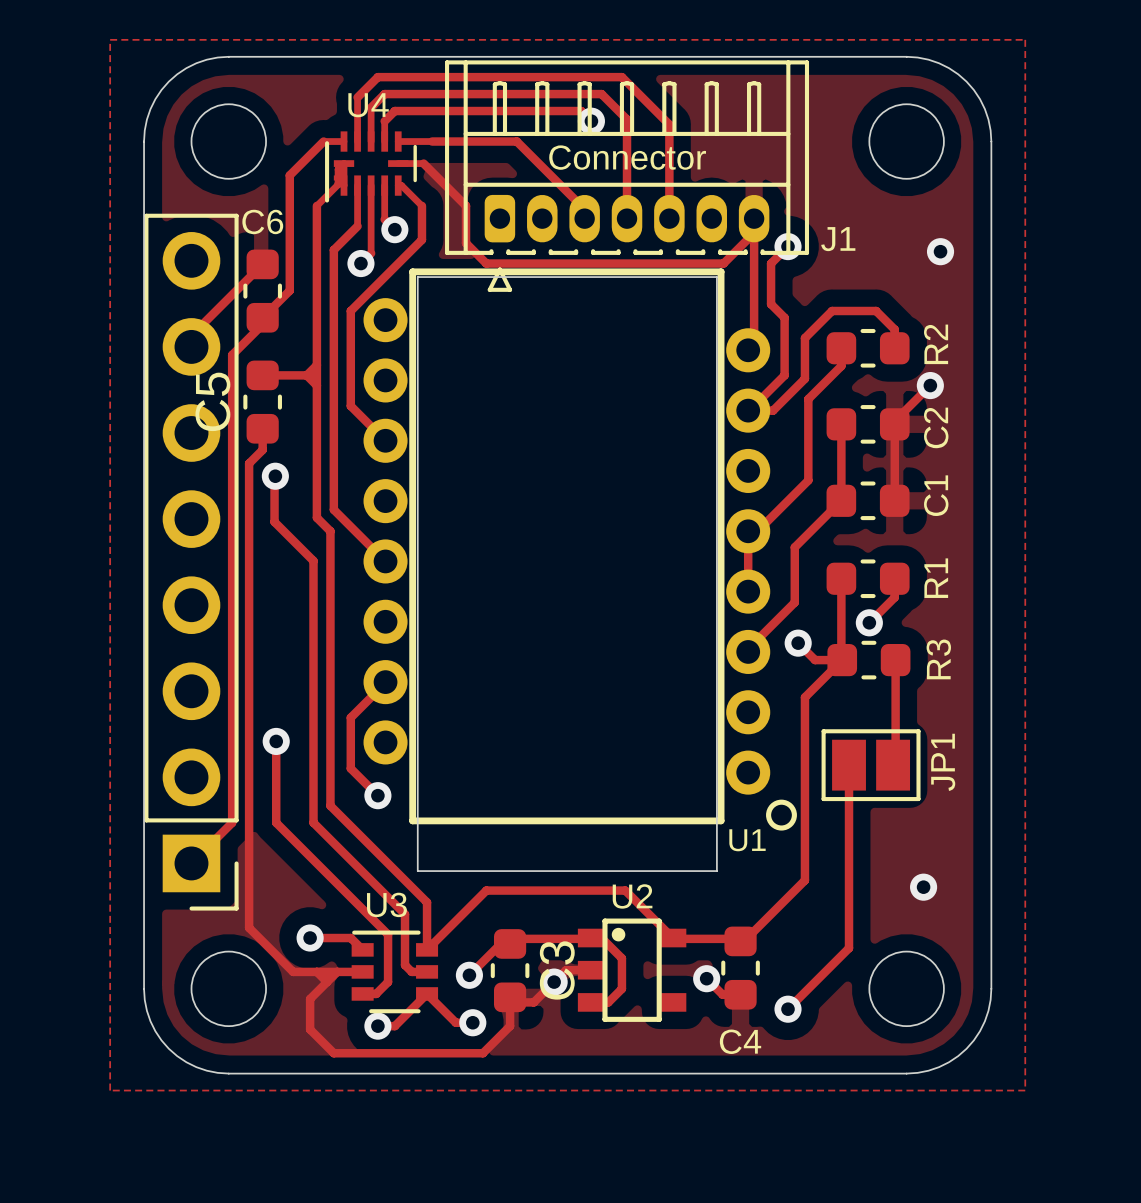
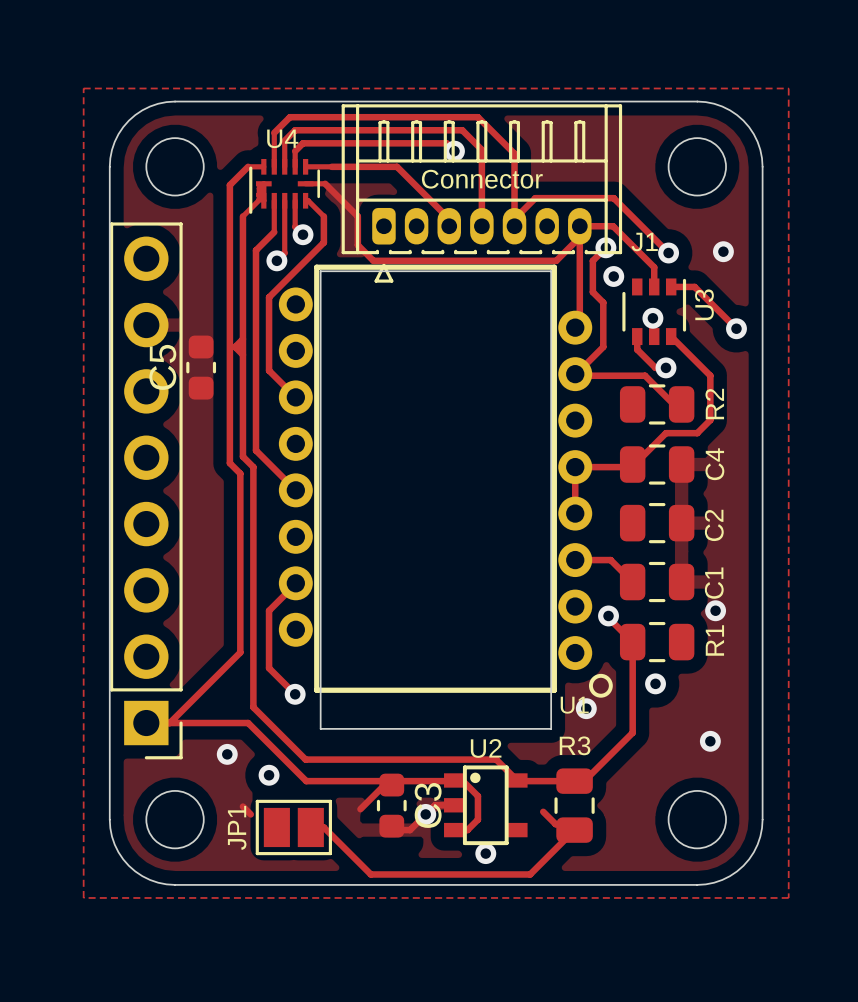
track: (299, 165) (289, 175) (289, 290) (262, 317) -> (229, 185) (229, 463) (240, 473) (240, 489)
track: none -> (514, 219) (535, 198) (613, 198) (668, 252)
track: none -> (579, 226) (613, 226) (654, 267) (654, 286)
via: none -> (668, 252)
track: (262, 264) (191, 335) (191, 346) -> none
via: none -> (613, 276)
C6: (262, 291) -> none
track: none -> (671, 286) (694, 286) (736, 328)
track: (262, 317) (262, 324) (232, 355) (232, 822) (191, 863) -> (391, 781) (306, 781) (248, 723) (146, 723)
R2 footprint: [826, 328, 910, 368] -> [619, 384, 695, 425]
via: none -> (652, 318)
track: (841, 348) (841, 366) (808, 399) (808, 480) (757, 531) -> (671, 336) (710, 375) (710, 420) (697, 433) (665, 433) (630, 467) (582, 467)
track: (894, 348) (894, 329) (876, 310) (832, 310) (804, 338) (804, 378) (773, 410) (749, 410) -> (681, 404) (673, 404) (645, 375) (576, 375) (575, 374)
via: none -> (736, 328)
track: none -> (637, 336) (637, 349) (655, 367) (665, 367)
track: (262, 375) (306, 375) -> none
track: (930, 385) (894, 421) (894, 500) -> none
via: (930, 385) -> none
via: none -> (665, 367)
C2 footprint: [826, 405, 910, 444] -> [619, 503, 695, 544]
track: (841, 424) (841, 500) (794, 547) (794, 602) (748, 649) (748, 651) -> (632, 582) (610, 560) (575, 560)
track: (262, 428) (262, 449) (249, 463) (249, 927) (293, 971) (362, 971) -> none
track: (275, 476) (274, 521) (313, 560) -> none
via: (275, 476) -> none
C1 footprint: [826, 481, 910, 521] -> [619, 561, 695, 603]
R1 footprint: [826, 559, 910, 599] -> [619, 621, 695, 663]
track: (841, 578) (842, 660) -> none
track: (894, 578) (894, 597) (869, 622) -> none
via: (869, 622) -> none
R3 footprint: [827, 640, 911, 680] -> [554, 768, 595, 843]
track: (798, 643) (815, 660) (842, 660) -> none
via: (798, 643) -> none
R3 name position: R3 (938, 659) -> R3 (575, 745)
track: (842, 660) (804, 697) (804, 880) (743, 941) (740, 941) -> none
track: (895, 660) (895, 762) (893, 765) -> none
via: none -> (715, 610)
track: none -> (608, 615) (632, 642) (632, 732) (584, 781) (574, 781)
via: none -> (608, 615)
track: (276, 741) (276, 822) (388, 934) (388, 982) (376, 993) (362, 993) -> none
via: (276, 741) -> none
JP1 name position: JP1 (943, 762) -> JP1 (237, 827)
track: (849, 765) (849, 948) (788, 1009) -> none
JP1 position: (871, 765) -> (293, 827)
track: (350, 768) (377, 795) -> (269, 649) (269, 668) (295, 694)
track: (313, 771) (313, 822) (405, 914) (405, 965) (411, 971) (427, 971) -> (240, 652) (169, 723)
via position: (377, 795) -> (295, 694)
track: (330, 805) (427, 902) (427, 949) (486, 890) (625, 890) (645, 910) -> (253, 678) (253, 707) (305, 759) (496, 759)
via: none -> (655, 683)
via: none -> (586, 708)
via: none -> (227, 754)
C4 footprint: [721, 926, 760, 1010] -> [619, 444, 695, 485]
via: none -> (269, 775)
track: (310, 938) (350, 938) (362, 949) -> none
via: (310, 938) -> none
track: (337, 971) (310, 999) (310, 1029) (333, 1053) (482, 1053) (510, 1026) (510, 997) -> none
U3 rotation: 0° (394, 971) -> 90° clockwise (654, 311)
U3 position: (394, 971) -> (654, 311)
via: (469, 975) -> none
via: (706, 978) -> none
track: none -> (310, 827) (323, 827) (370, 874) (530, 874) (574, 830)
via: (788, 1009) -> none
track: (472, 1022) (455, 1022) (427, 993) (394, 1026) (377, 1026) -> none
via: (472, 1022) -> none
via: (377, 1026) -> none
via: none -> (485, 853)
C4 name position: C4 (740, 1041) -> C4 (714, 464)

